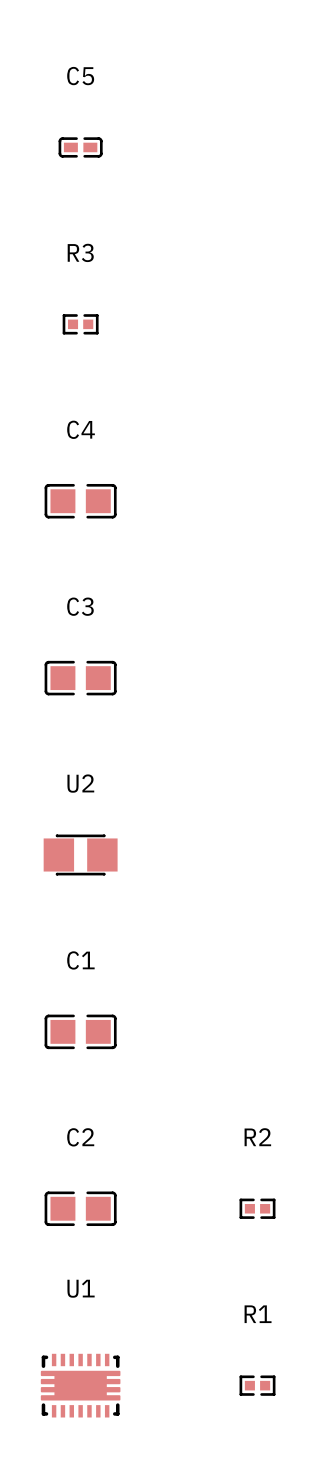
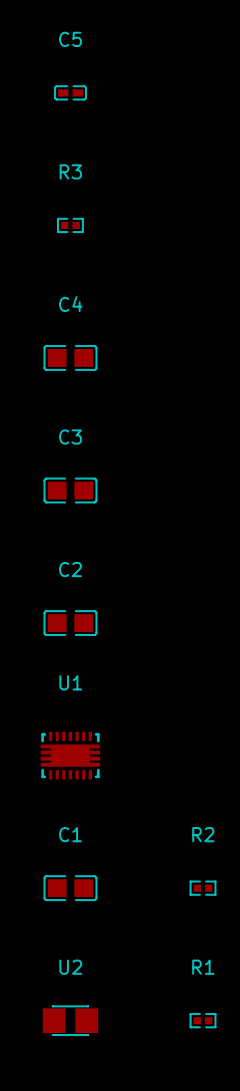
U2 position: (80, 854) -> (70, 1020)
C2: none -> (70, 623)
C1: (80, 1031) -> none
C2 name: C2 (80, 1137) -> C1 (70, 834)
U1 position: (80, 1388) -> (70, 757)

